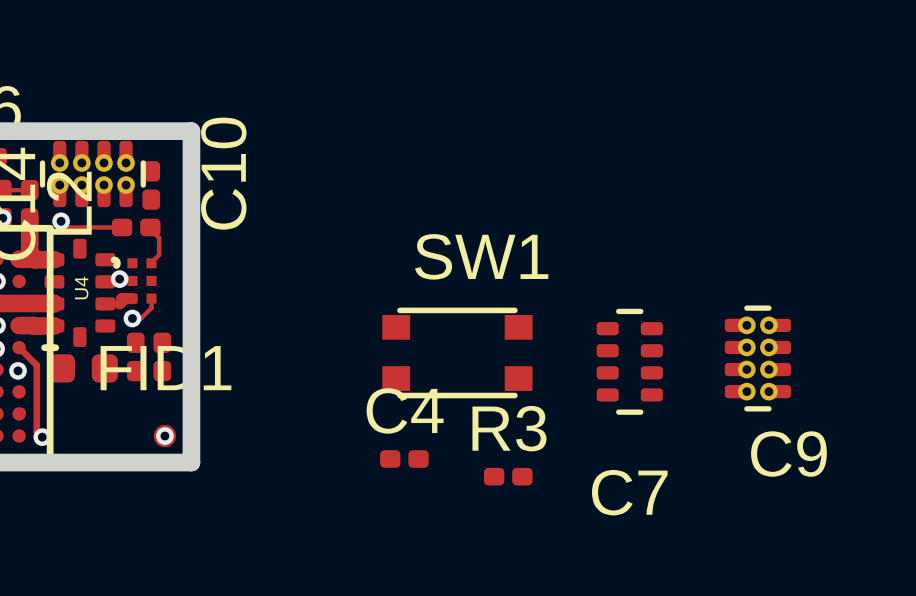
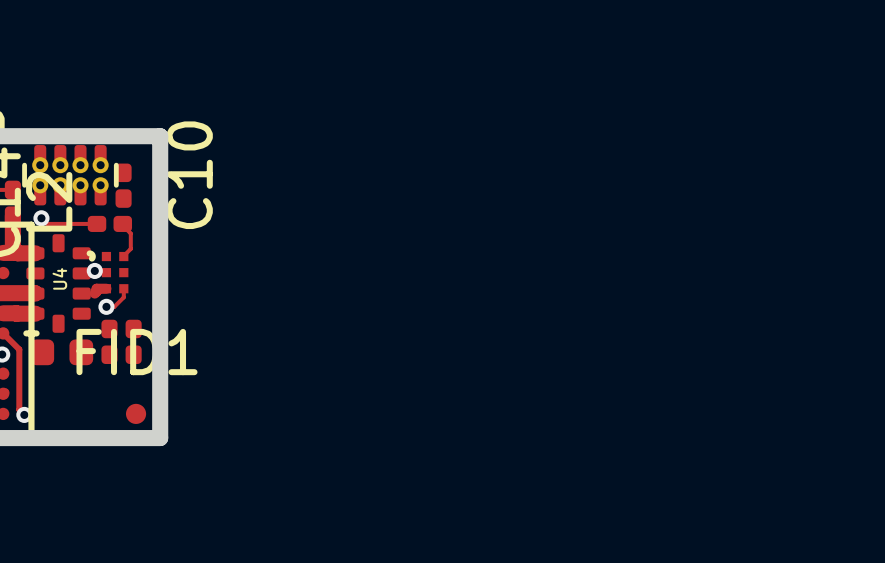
SW1: (457, 352) -> none
C9: (757, 358) -> none
C7: (629, 361) -> none
via: (164, 436) -> none
C4: (404, 459) -> none
R3: (508, 476) -> none

